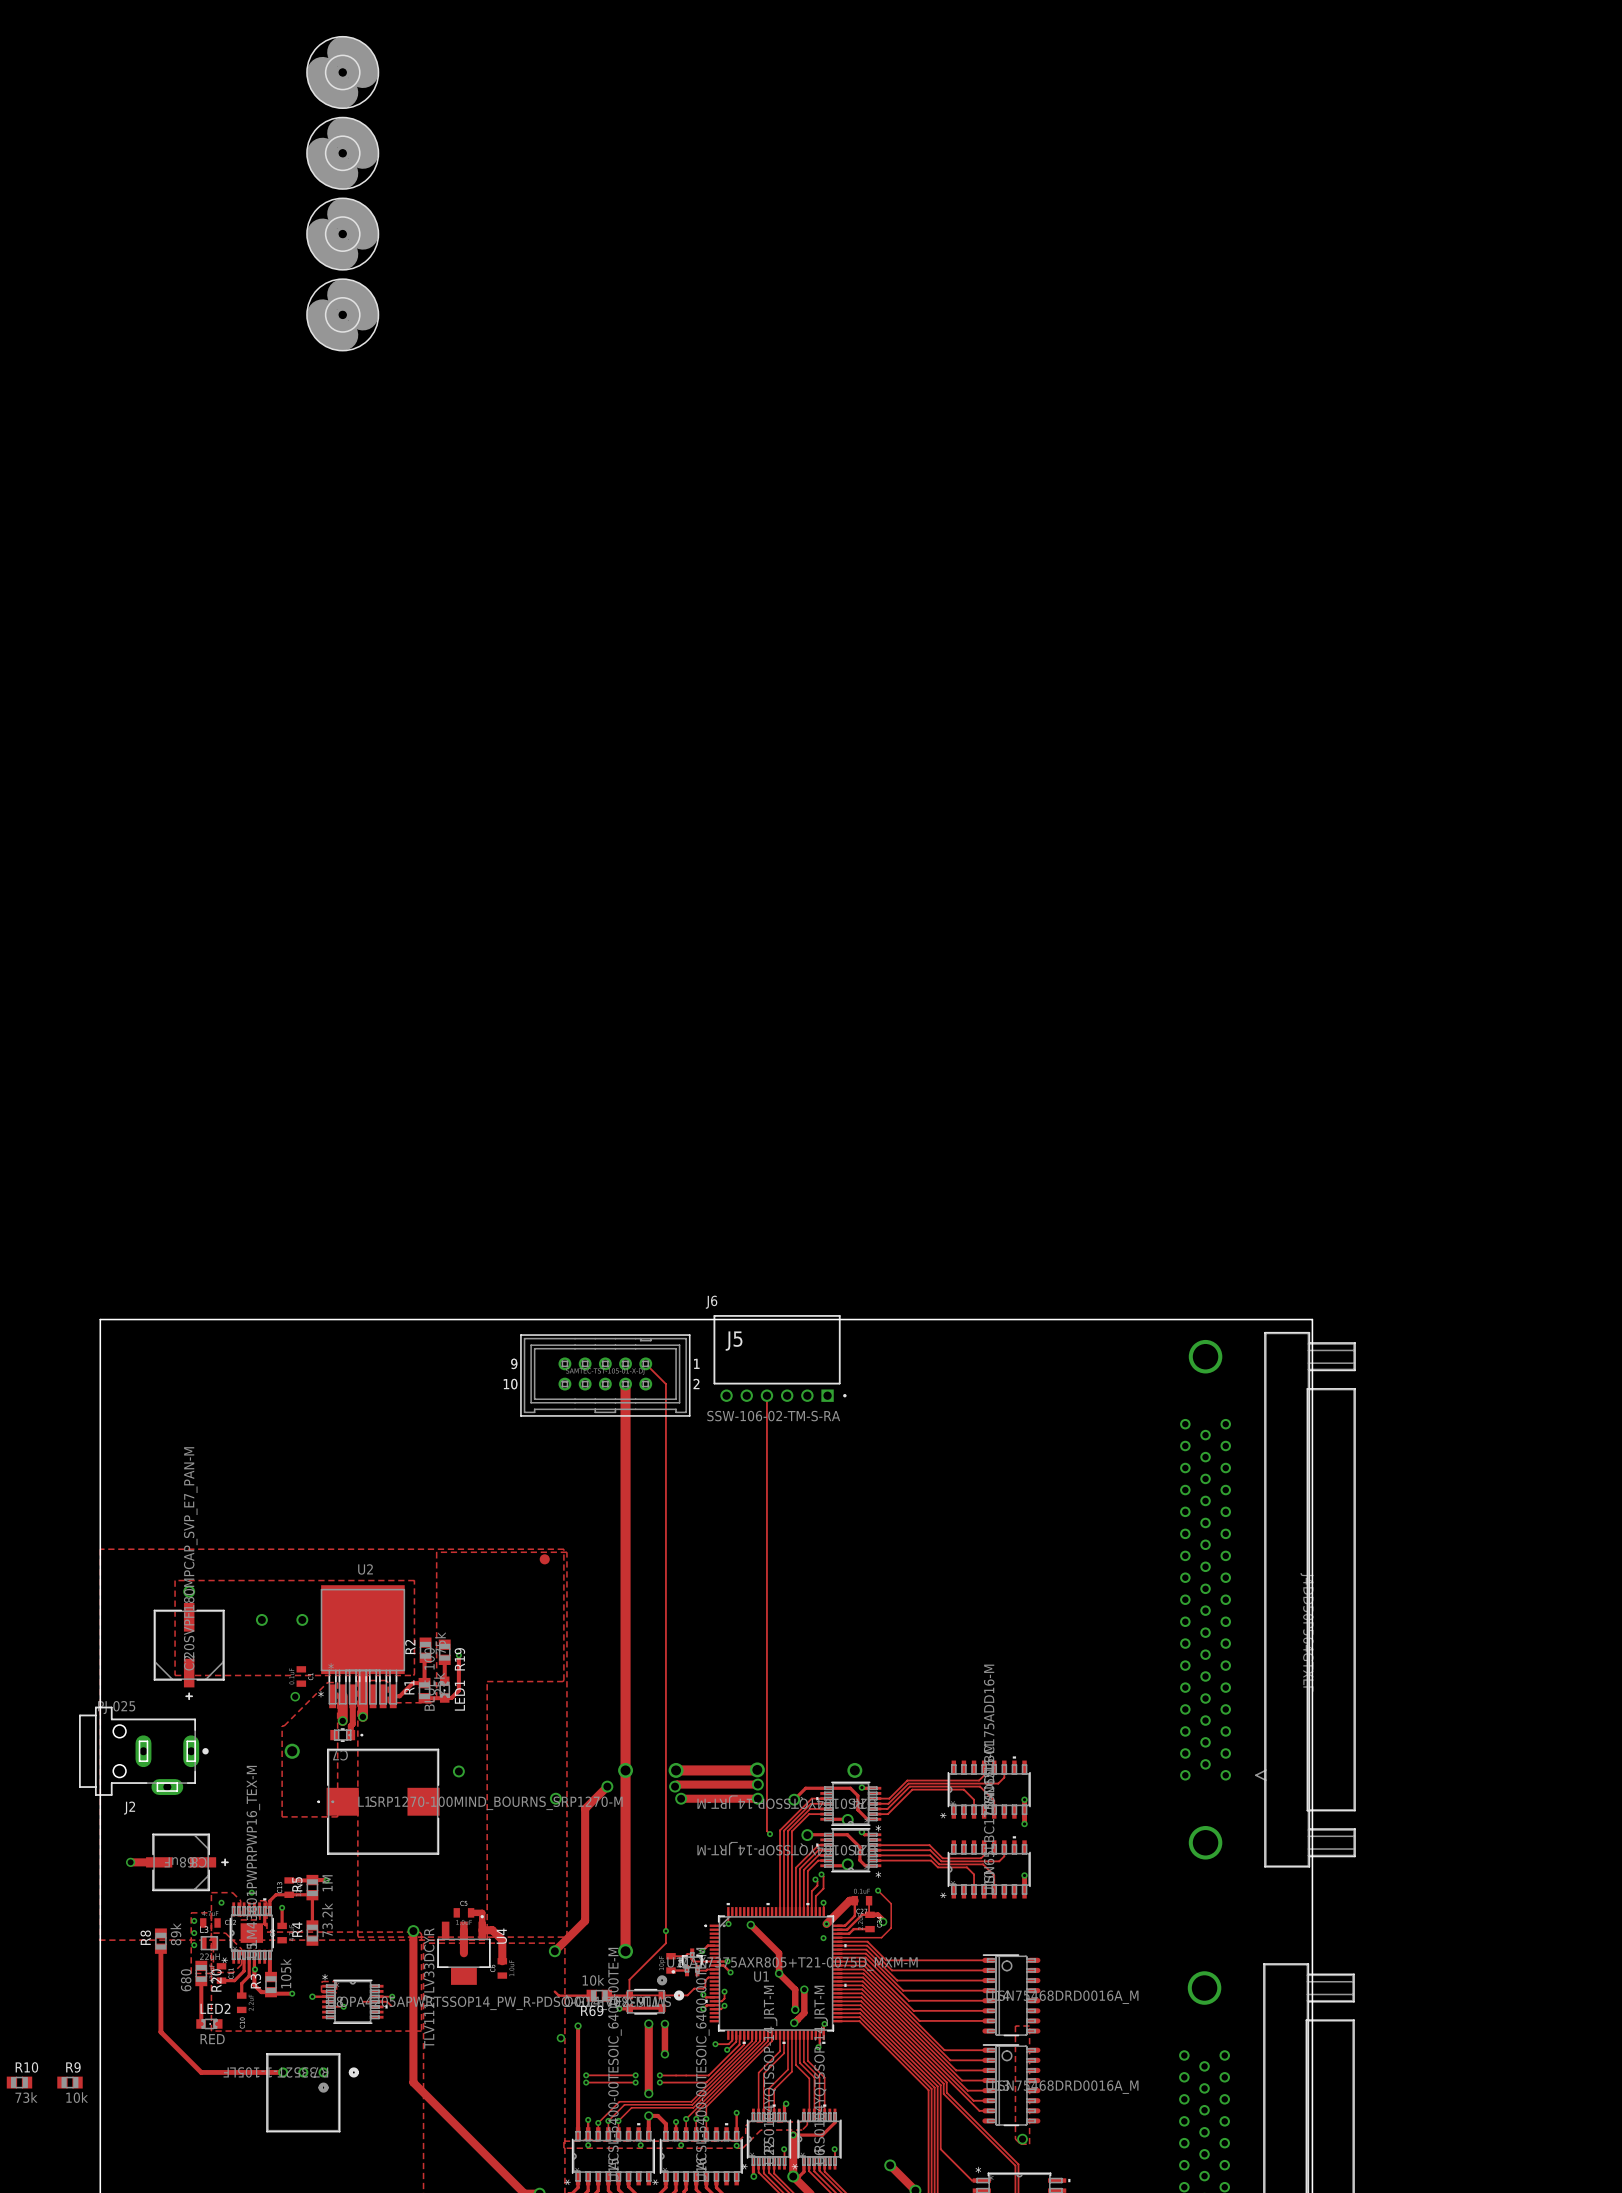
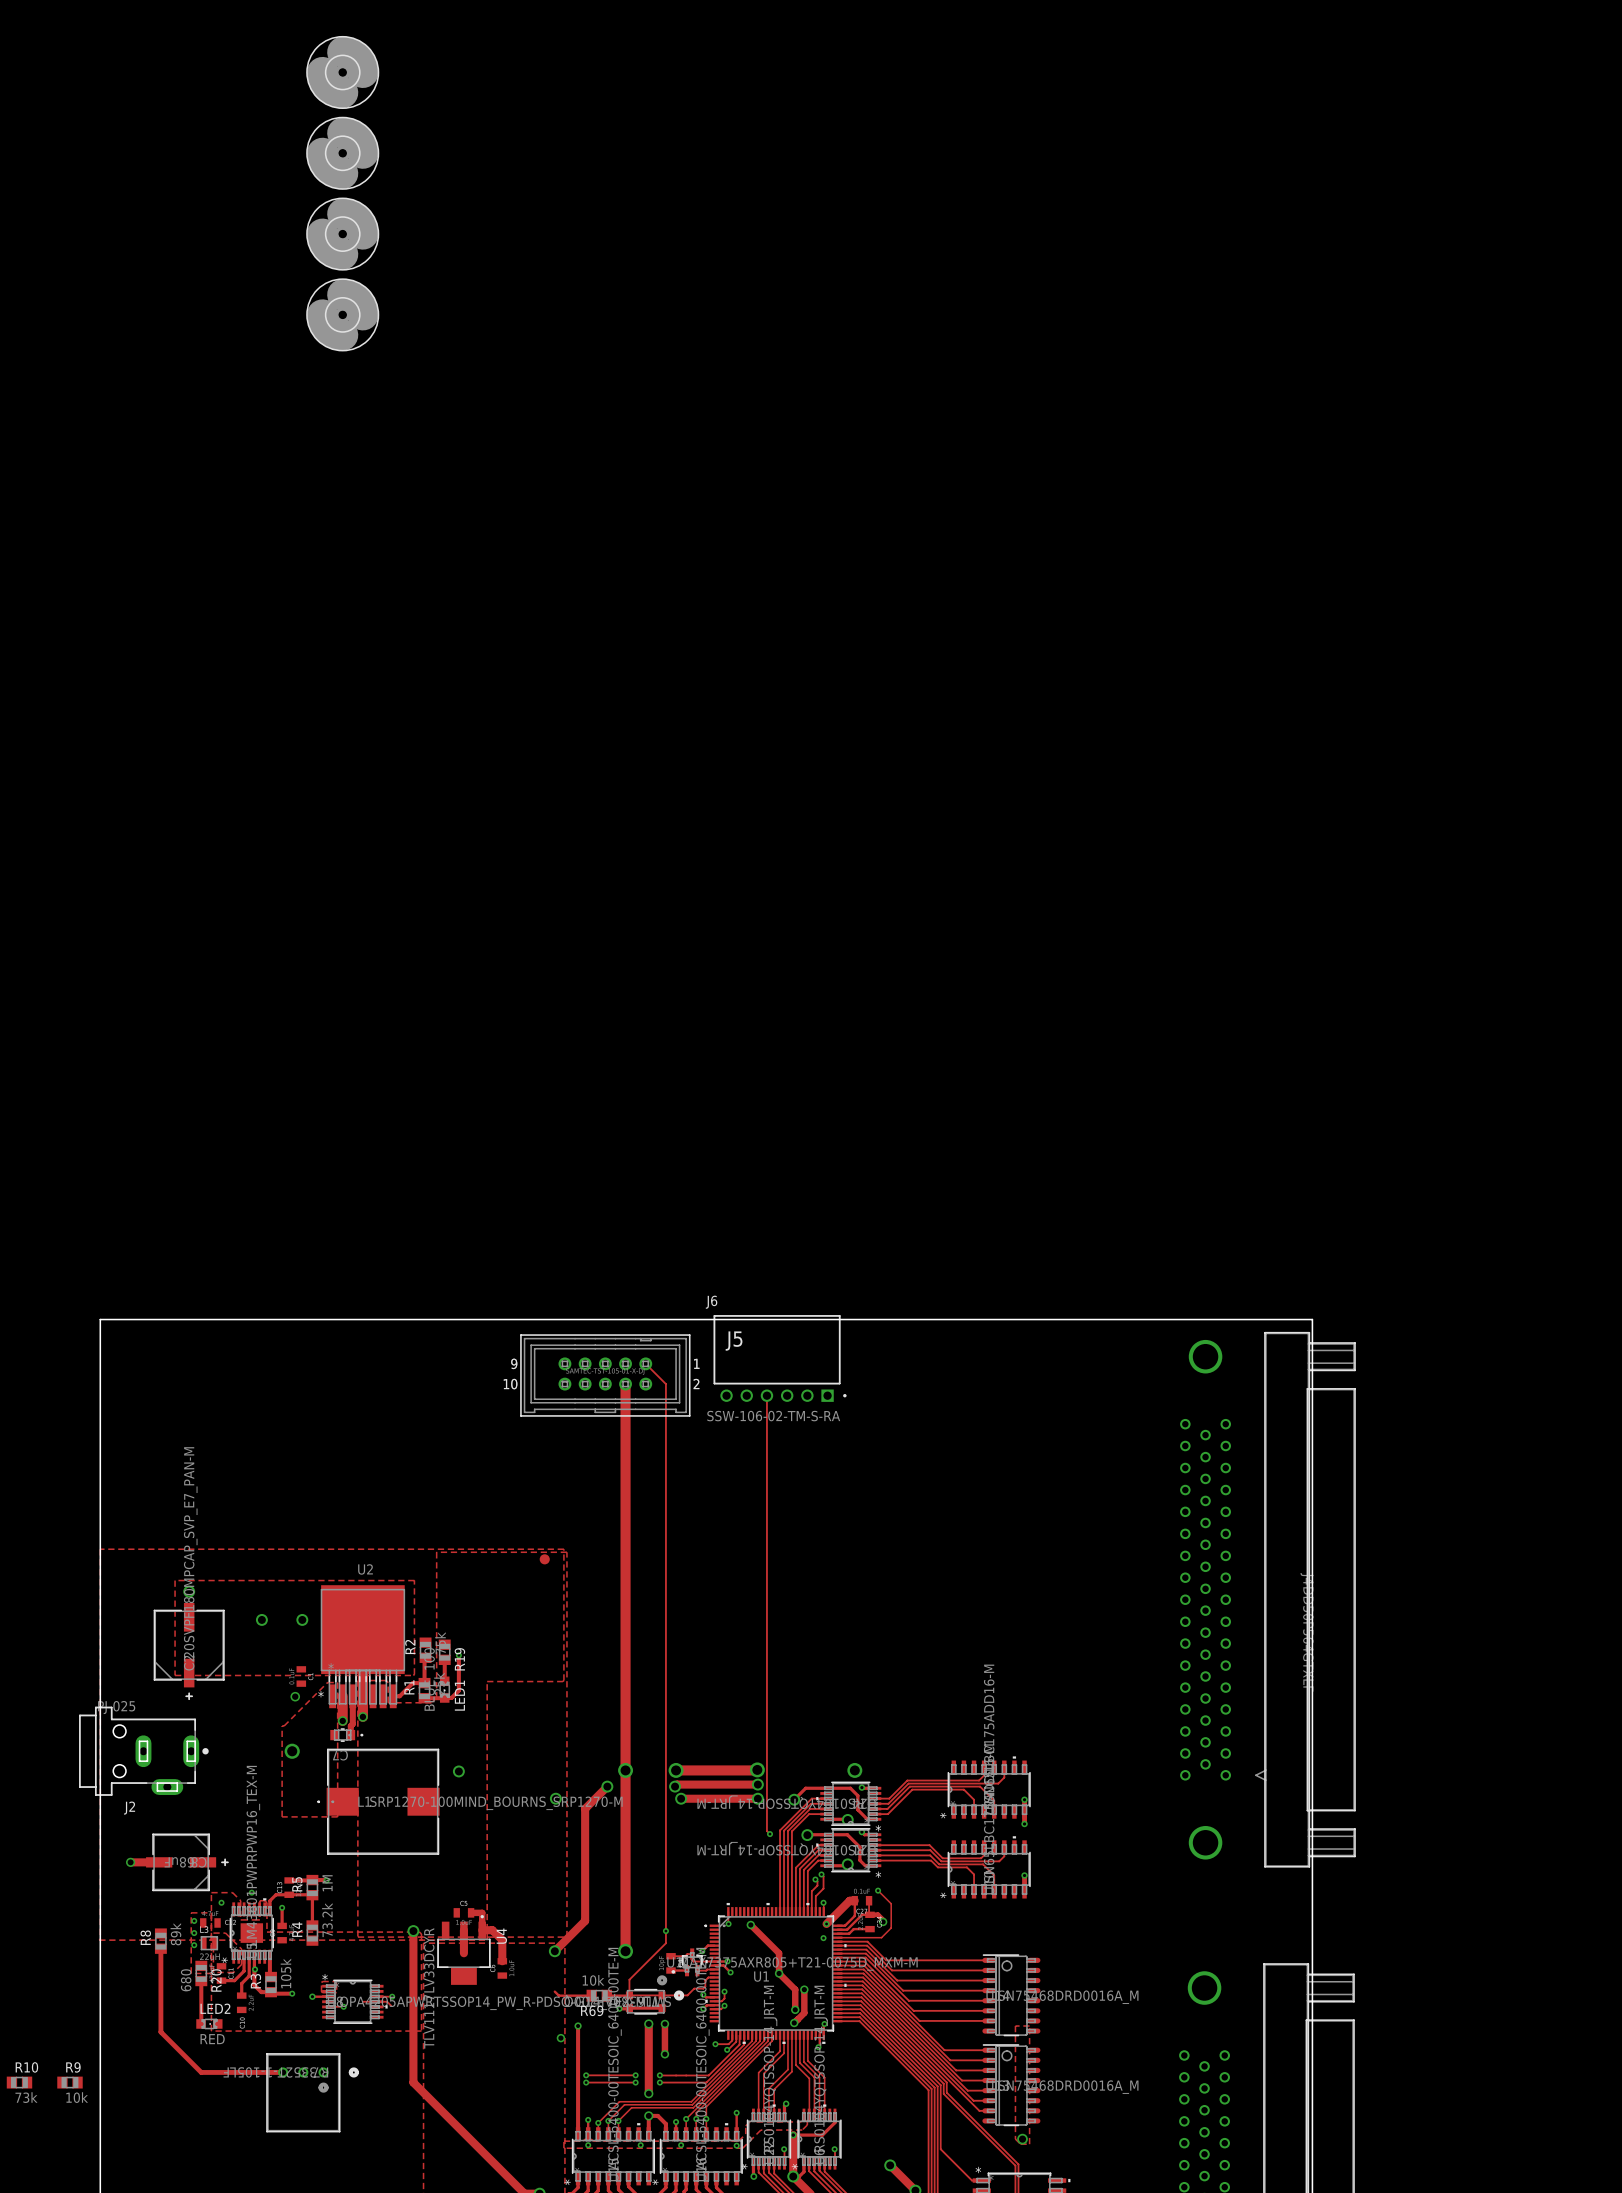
track: (264, 1909) (265, 1924) -> none

